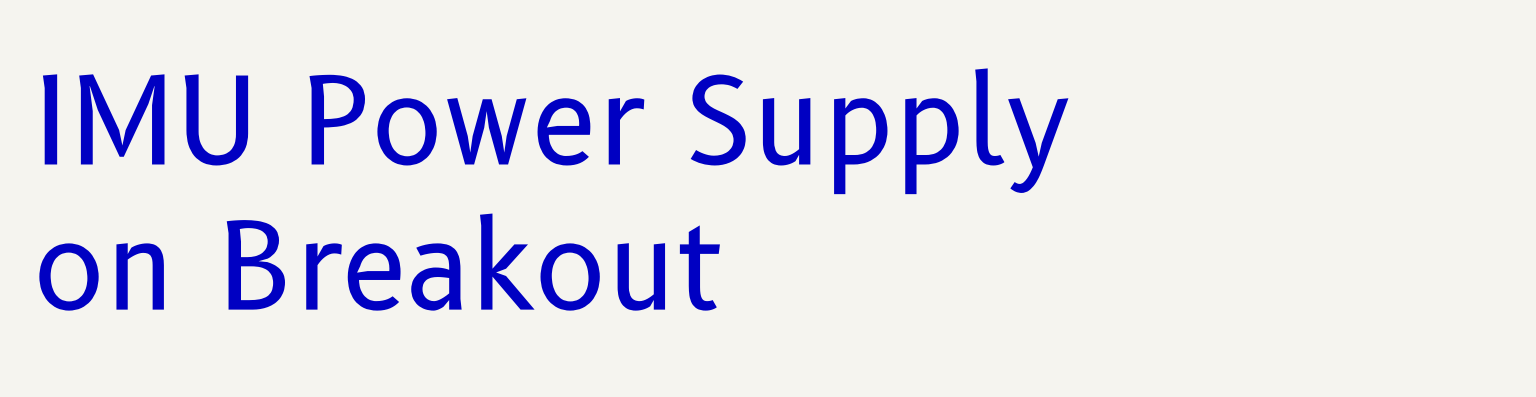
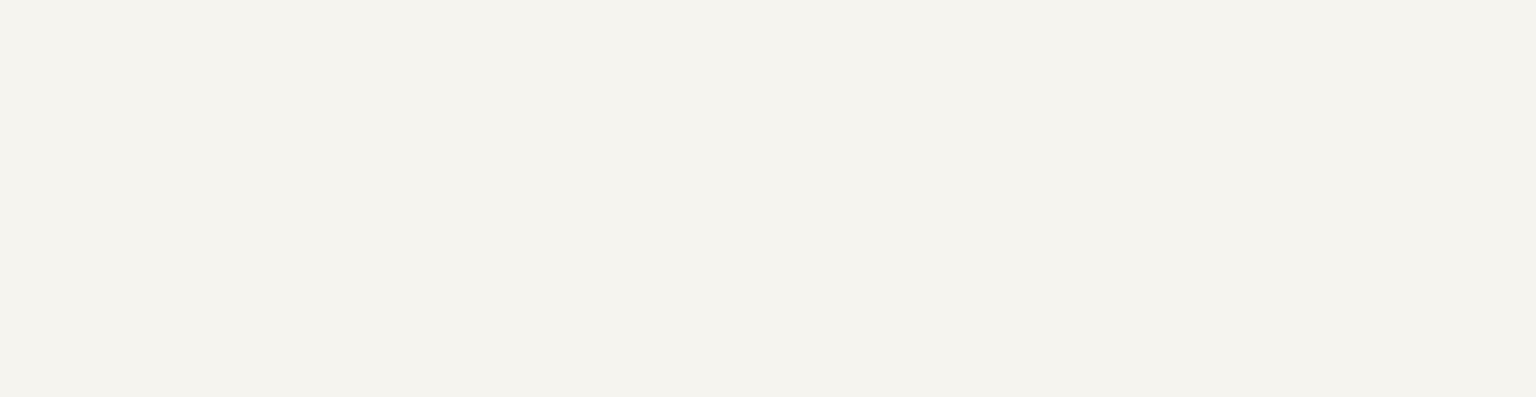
text: IMU Power Supply (555, 131) -> none
text: on Breakout (379, 262) -> none

